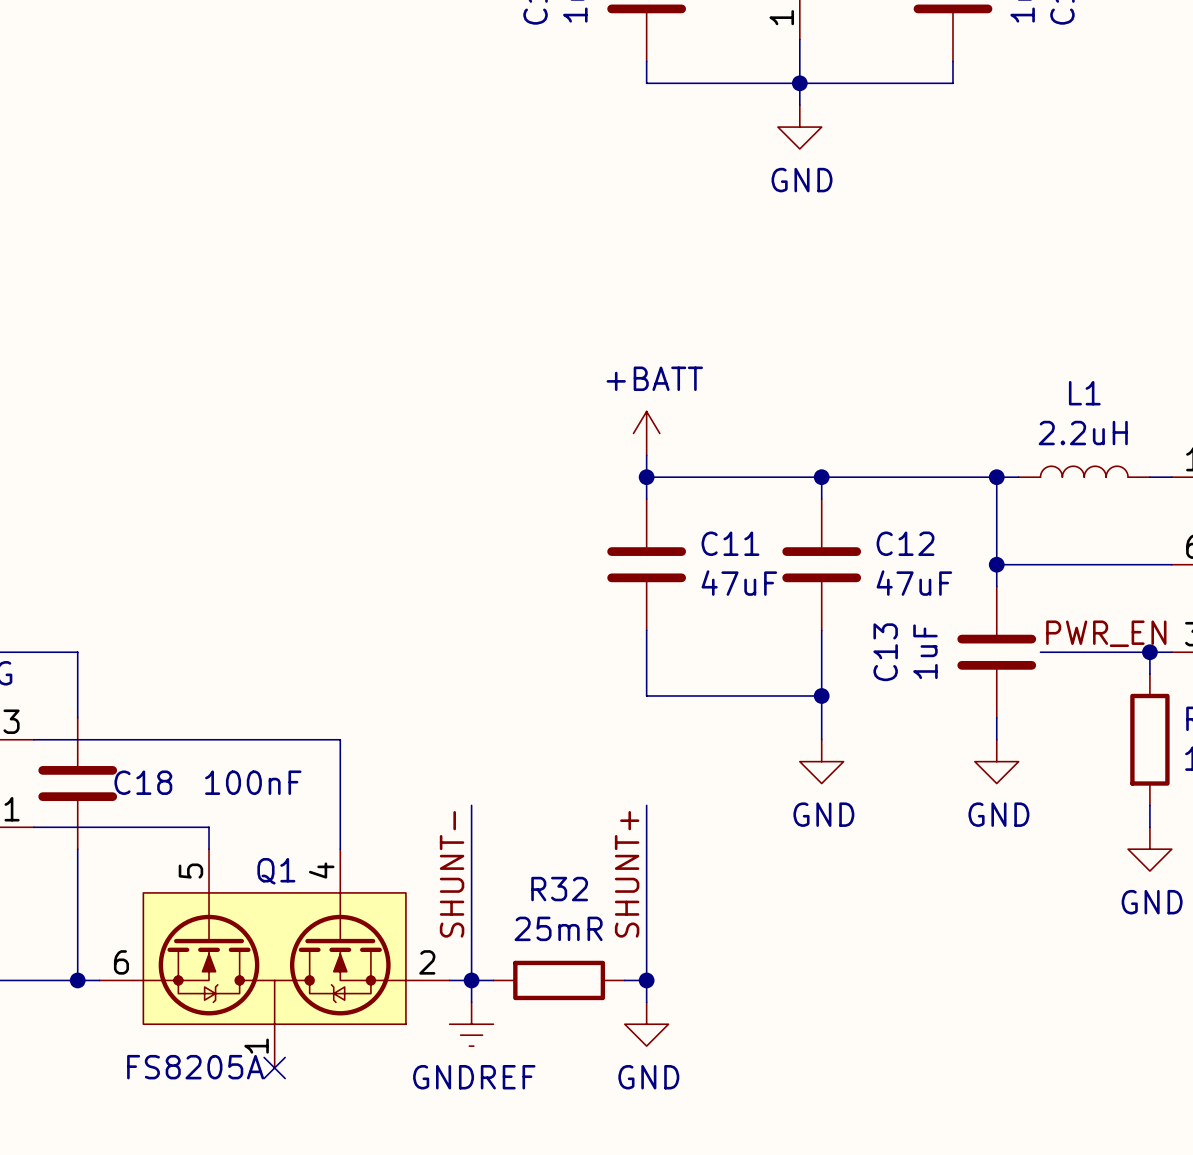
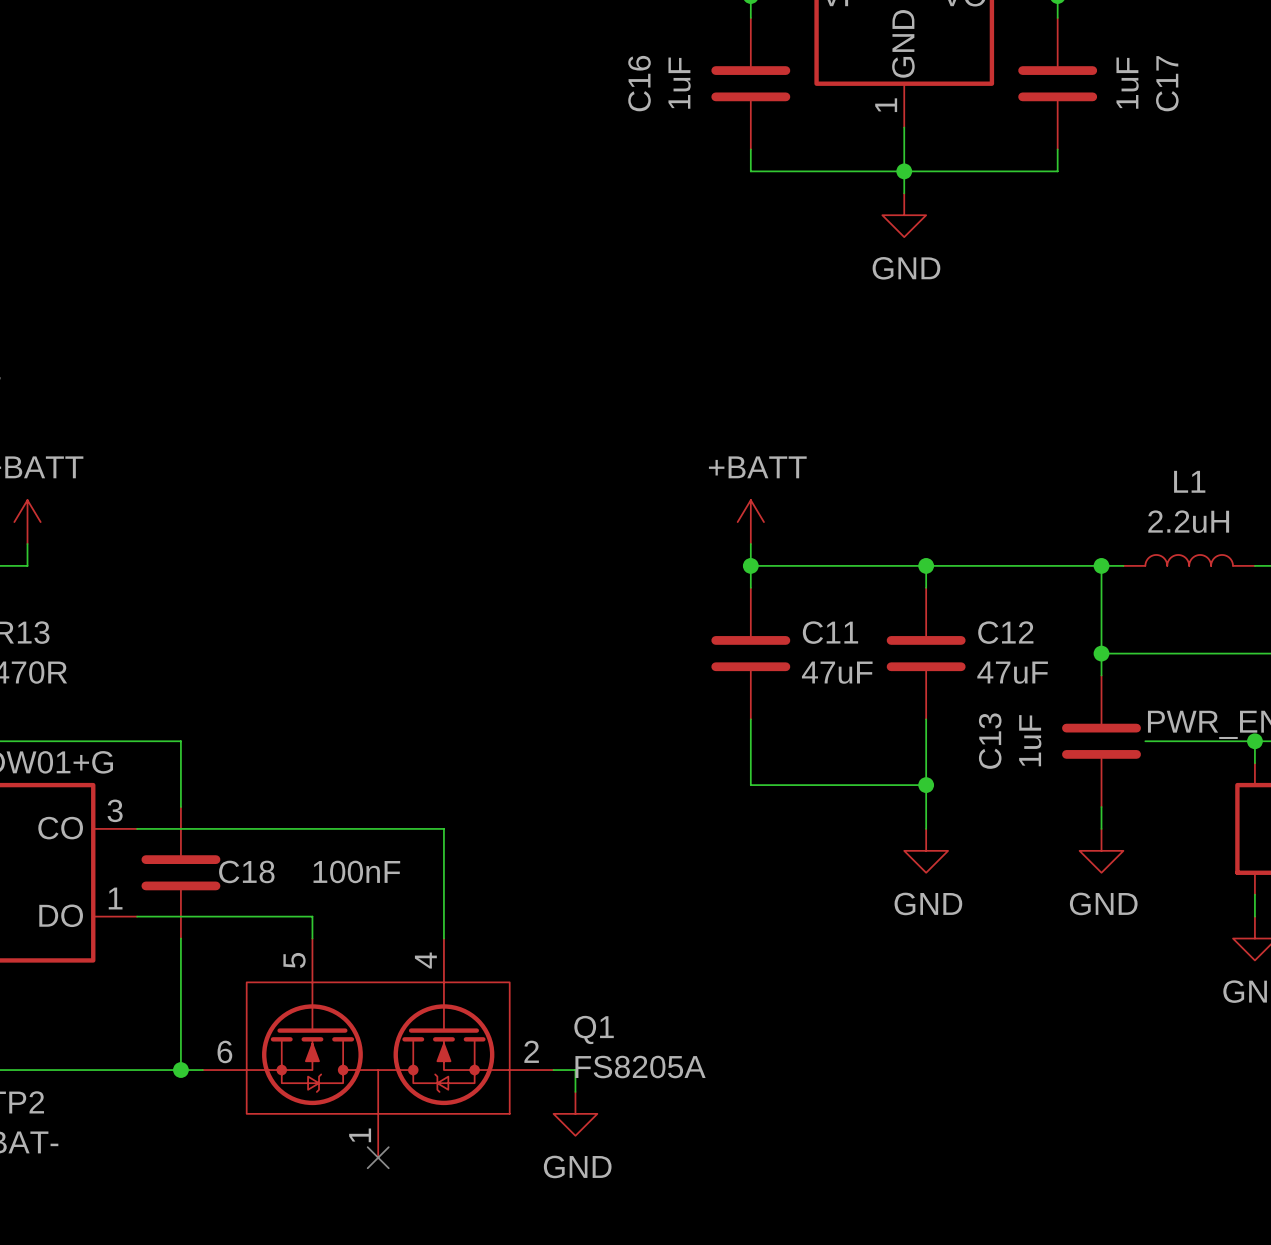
wire: (471, 805) (471, 980) (493, 980) -> none
wire: (646, 805) (646, 1002) -> none
Q1 name position: Q1 (276, 871) -> Q1 (594, 1029)
label: SHUNT- (452, 874) -> none
label: SHUNT+ (627, 874) -> none
junction: (471, 980) -> none
R32: 25mR (559, 980) -> none
wire: (624, 980) (646, 980) -> none
junction: (646, 980) -> none
power symbol: GNDREF (471, 1024) -> GND (575, 1113)
power symbol: GND (646, 1024) -> none
Q1 value position: FS8205A (195, 1067) -> FS8205A (640, 1067)

